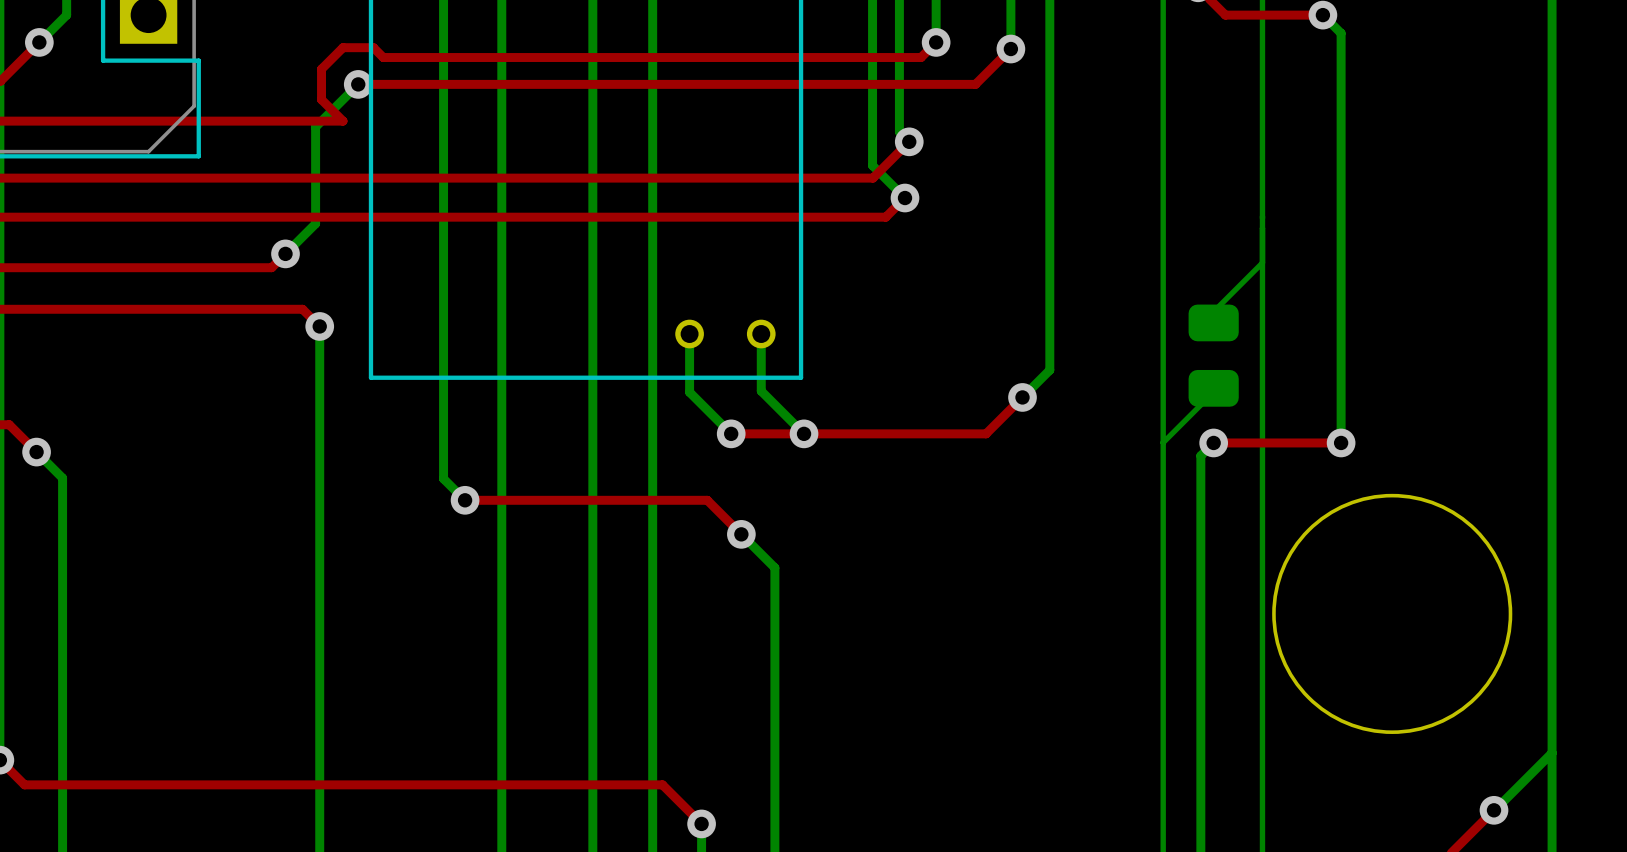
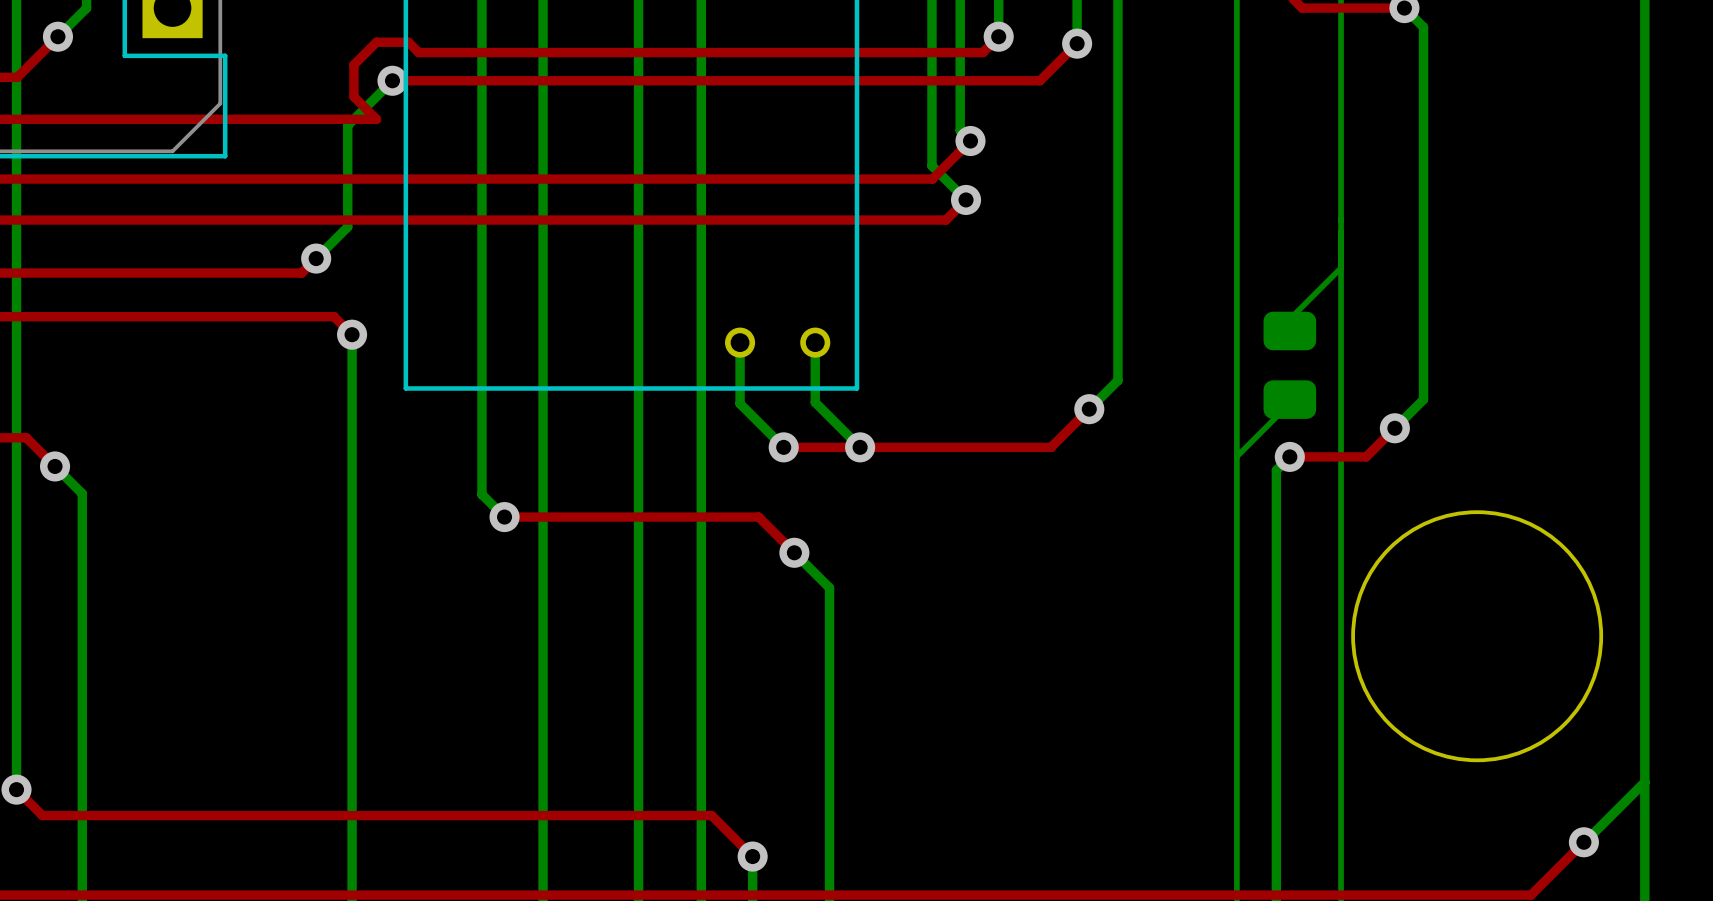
bottom track: (1341, 388) (1341, 442) -> (1423, 399) (1394, 428)
top track: (1286, 442) (1341, 442) -> (1366, 456) (1394, 428)
via position: (1341, 442) -> (1394, 428)

